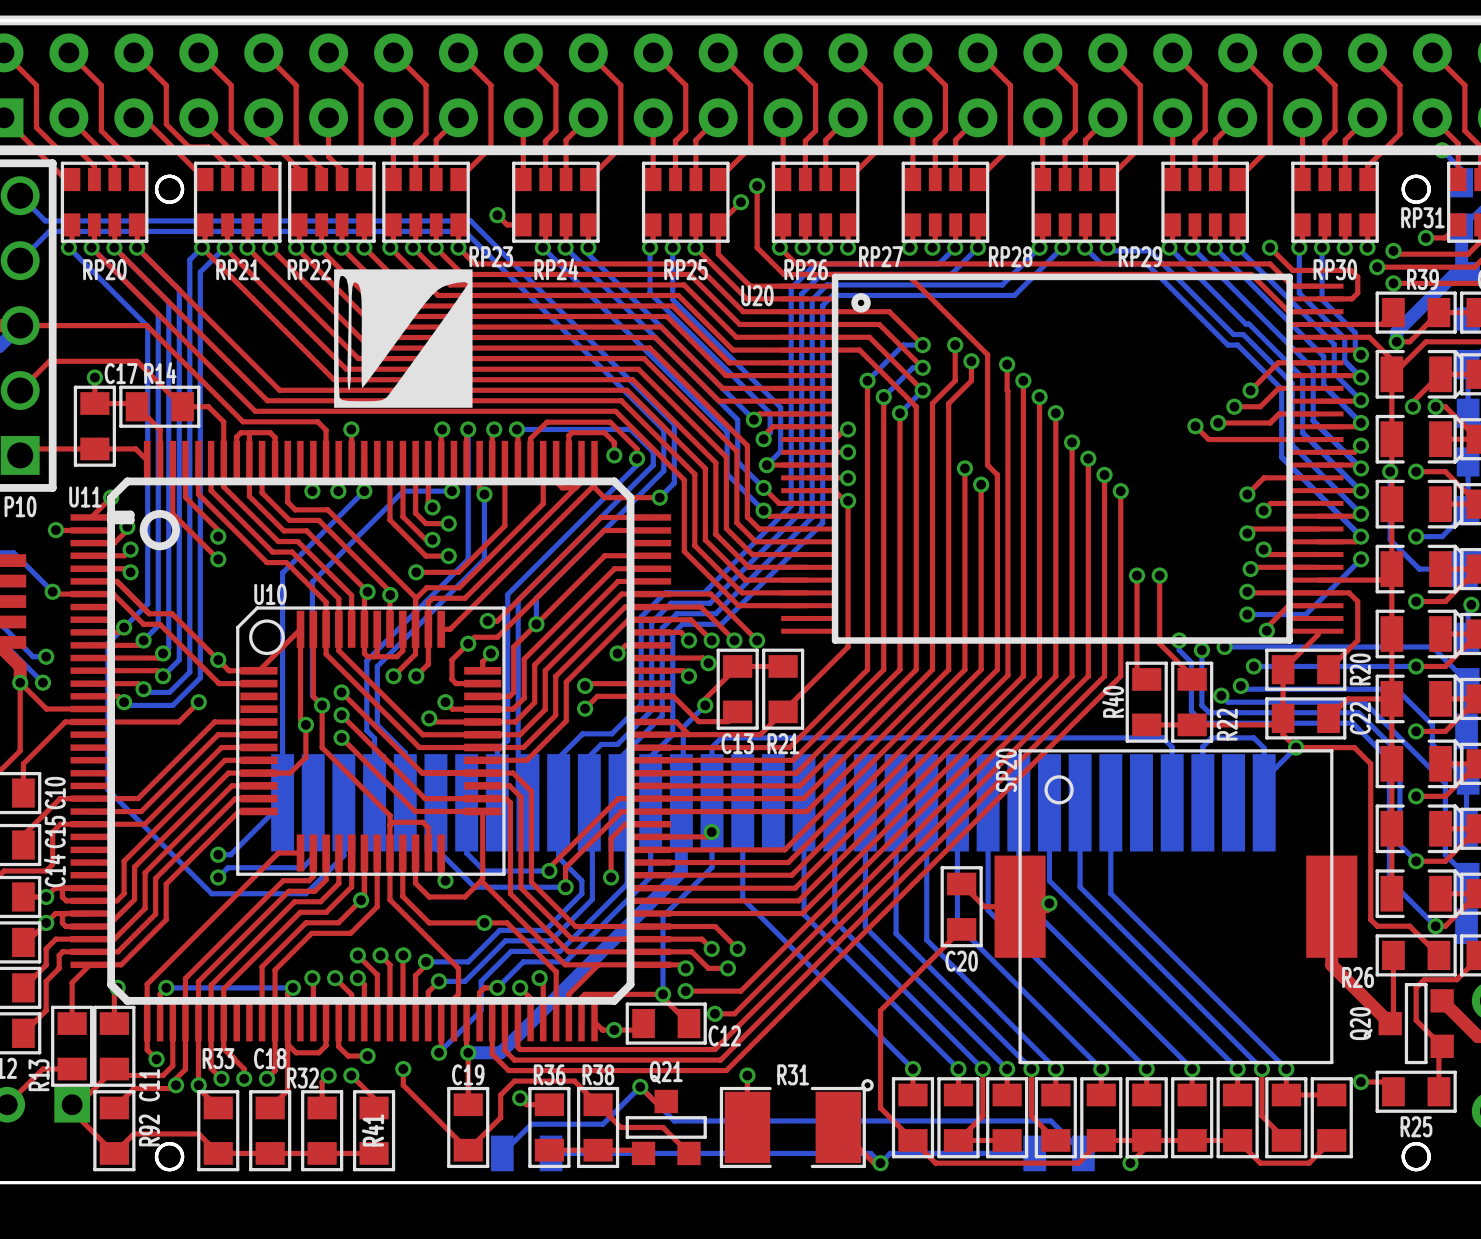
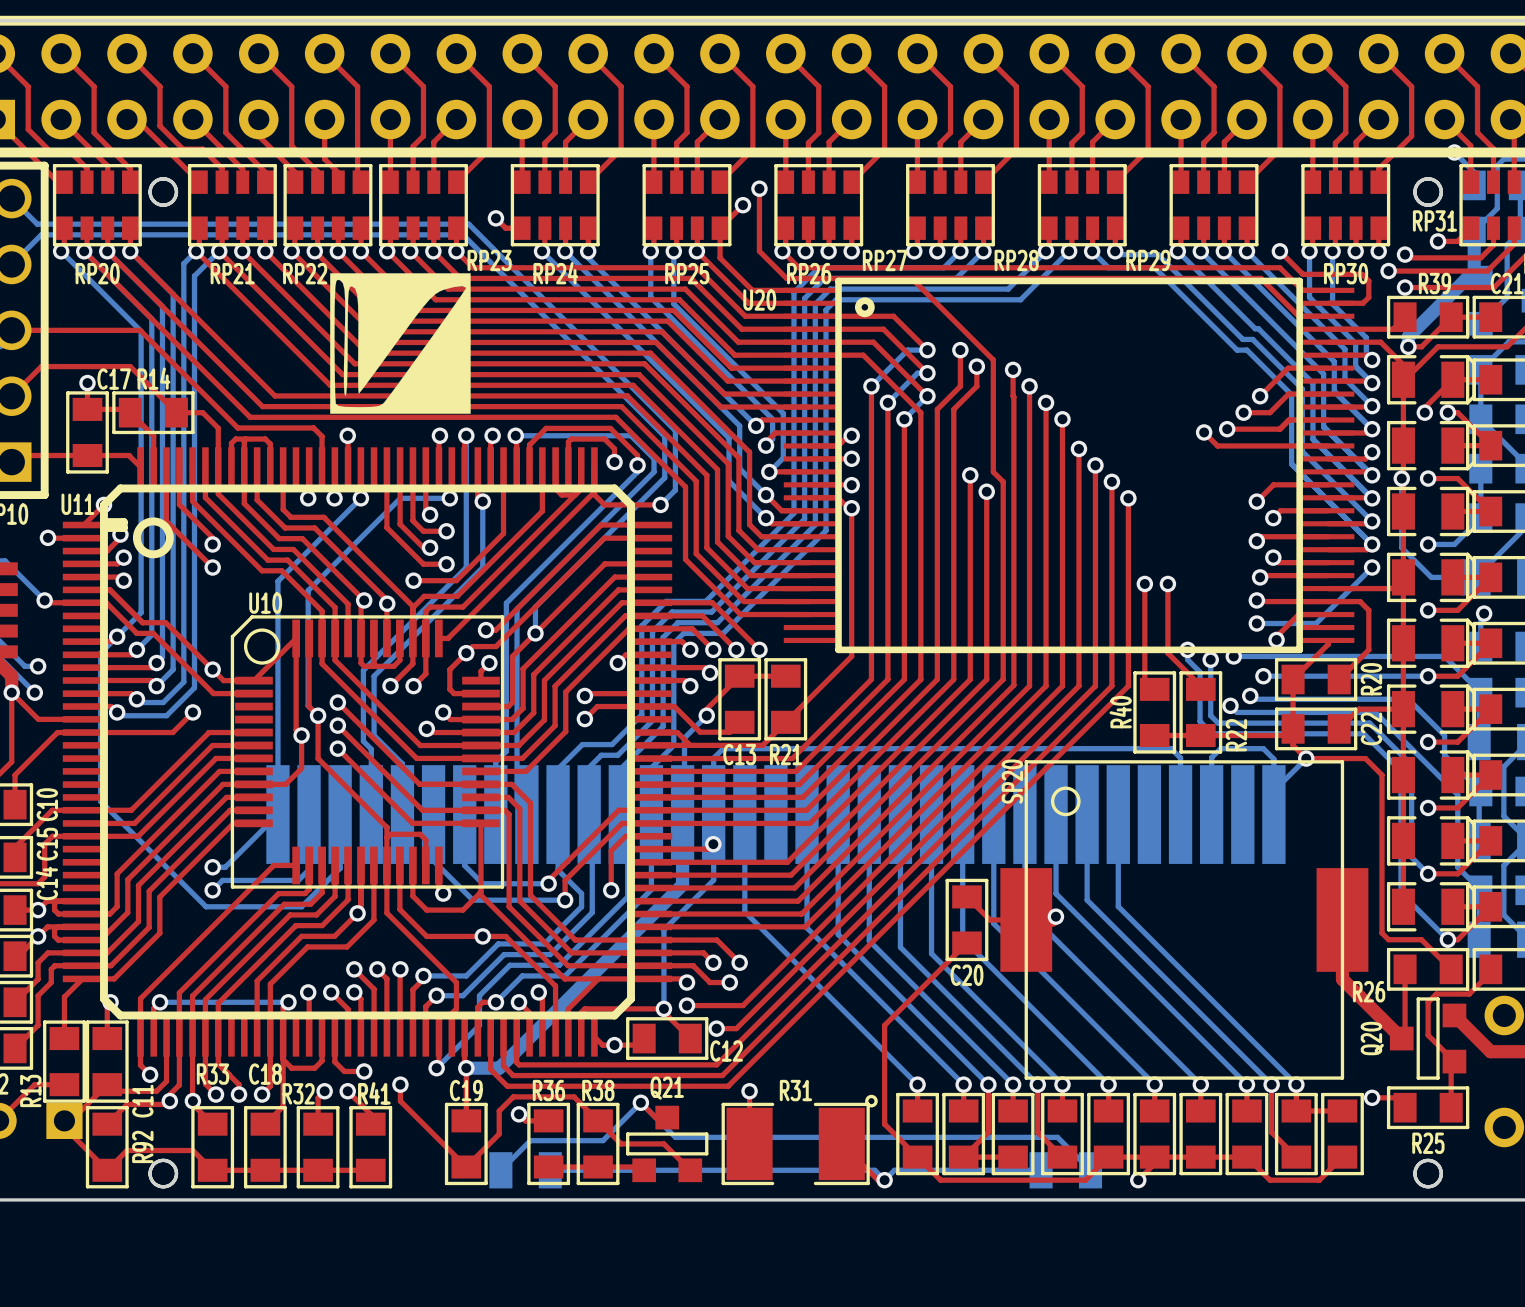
R41 name rotation: 0° (372, 1130) -> 90° clockwise (374, 1093)
R41 name position: R41 (372, 1130) -> R41 (374, 1093)

